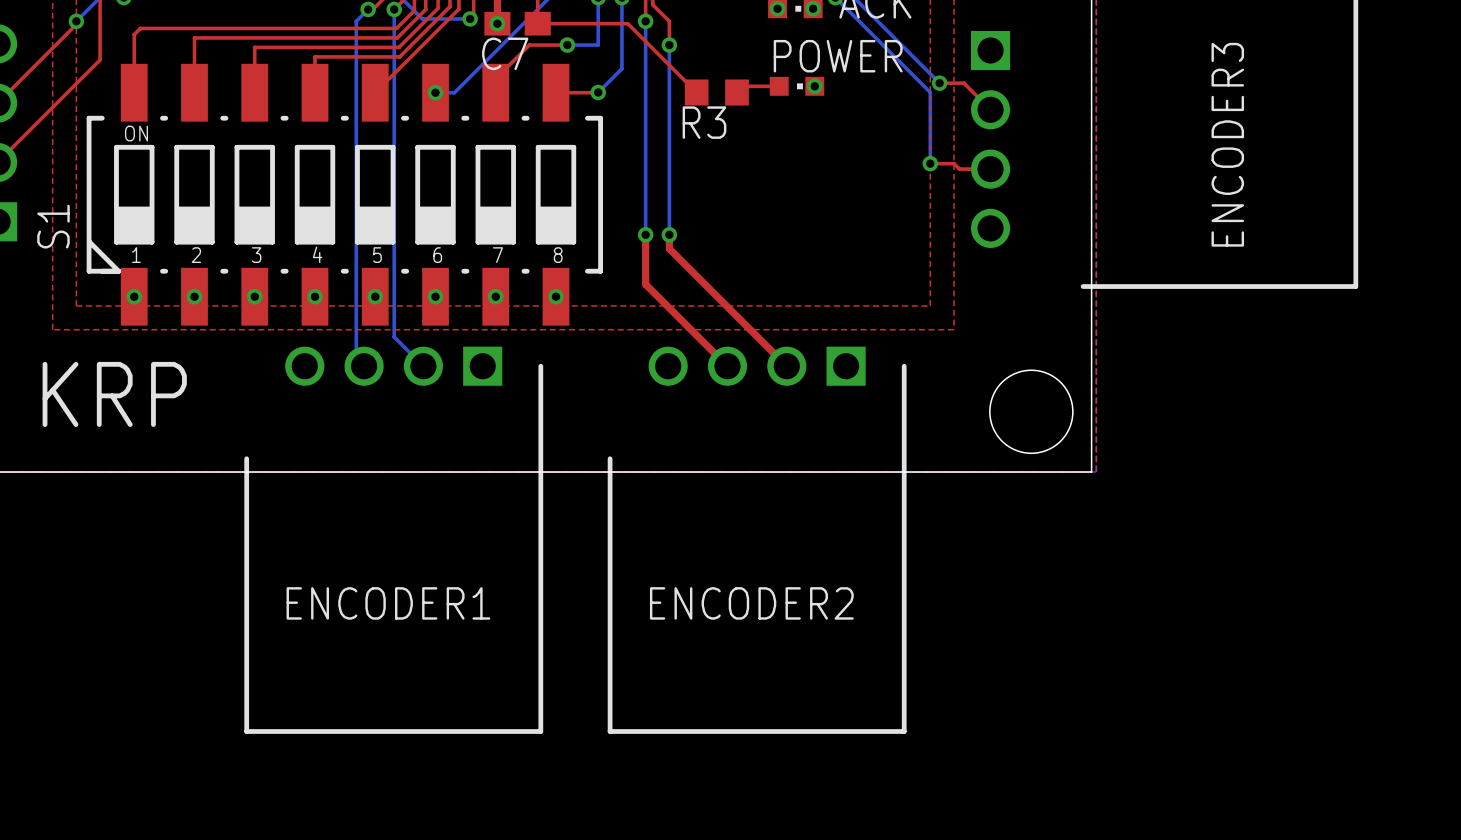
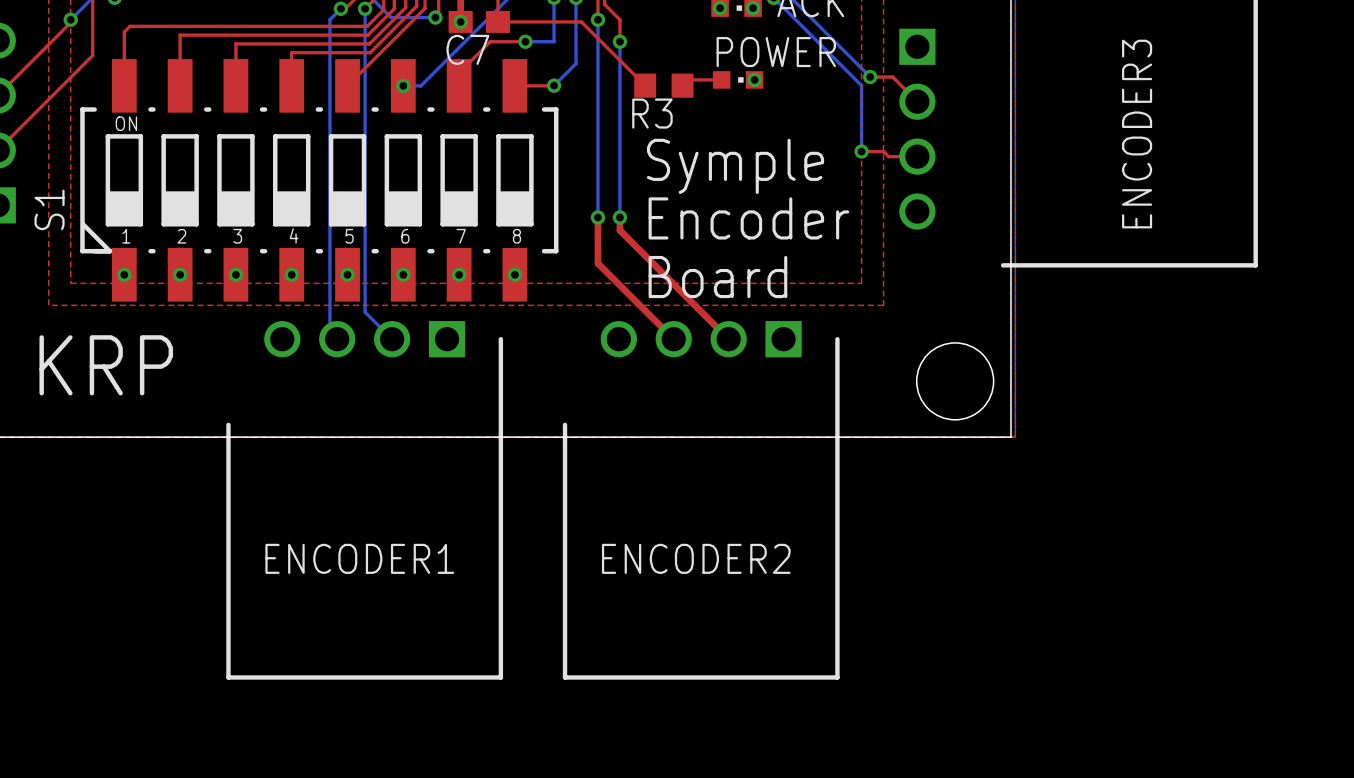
text: none -> Symple (735, 166)
text: none -> Encoder (748, 218)
text: none -> Board (717, 277)

